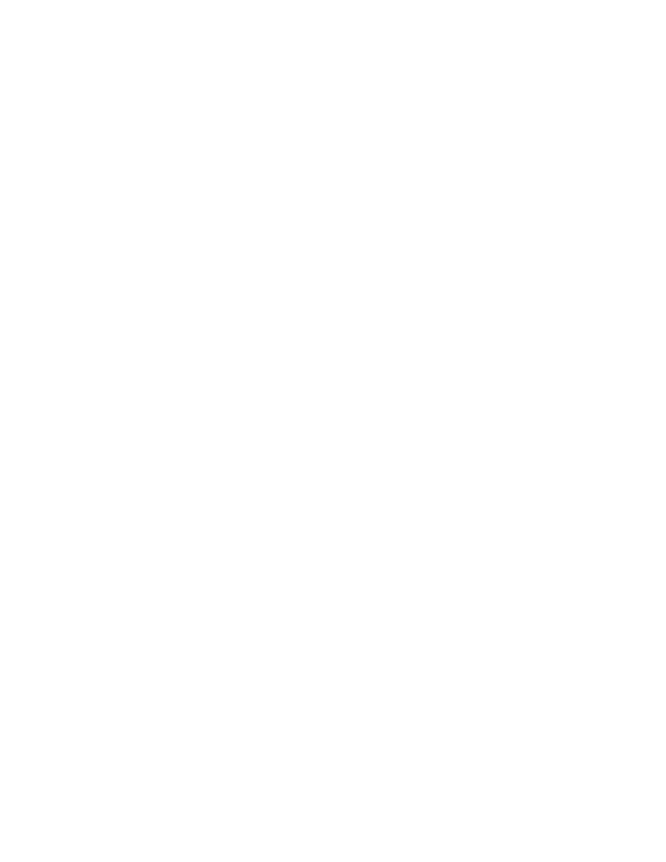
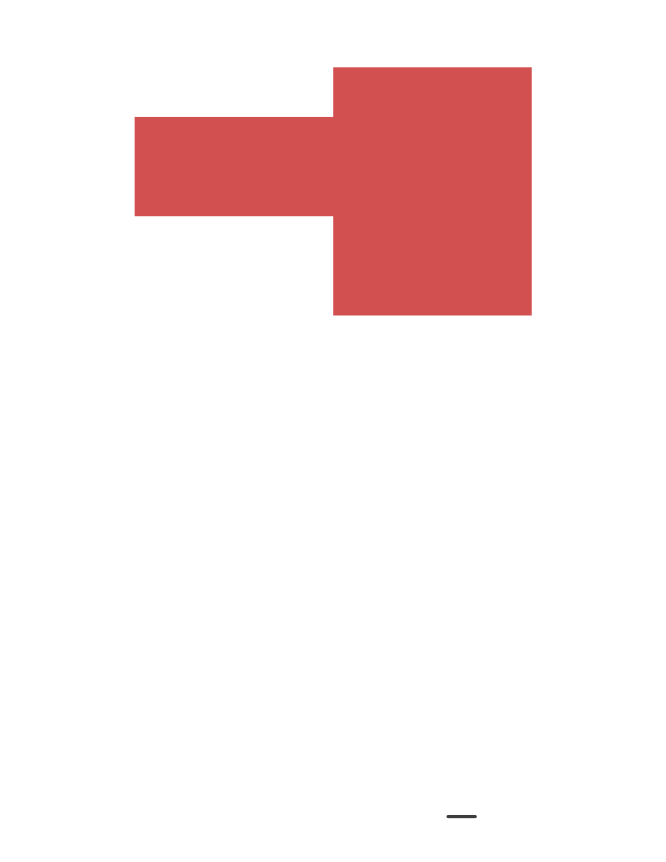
drawing: none -> [134, 67, 532, 316]
text: none -> - (461, 816)

